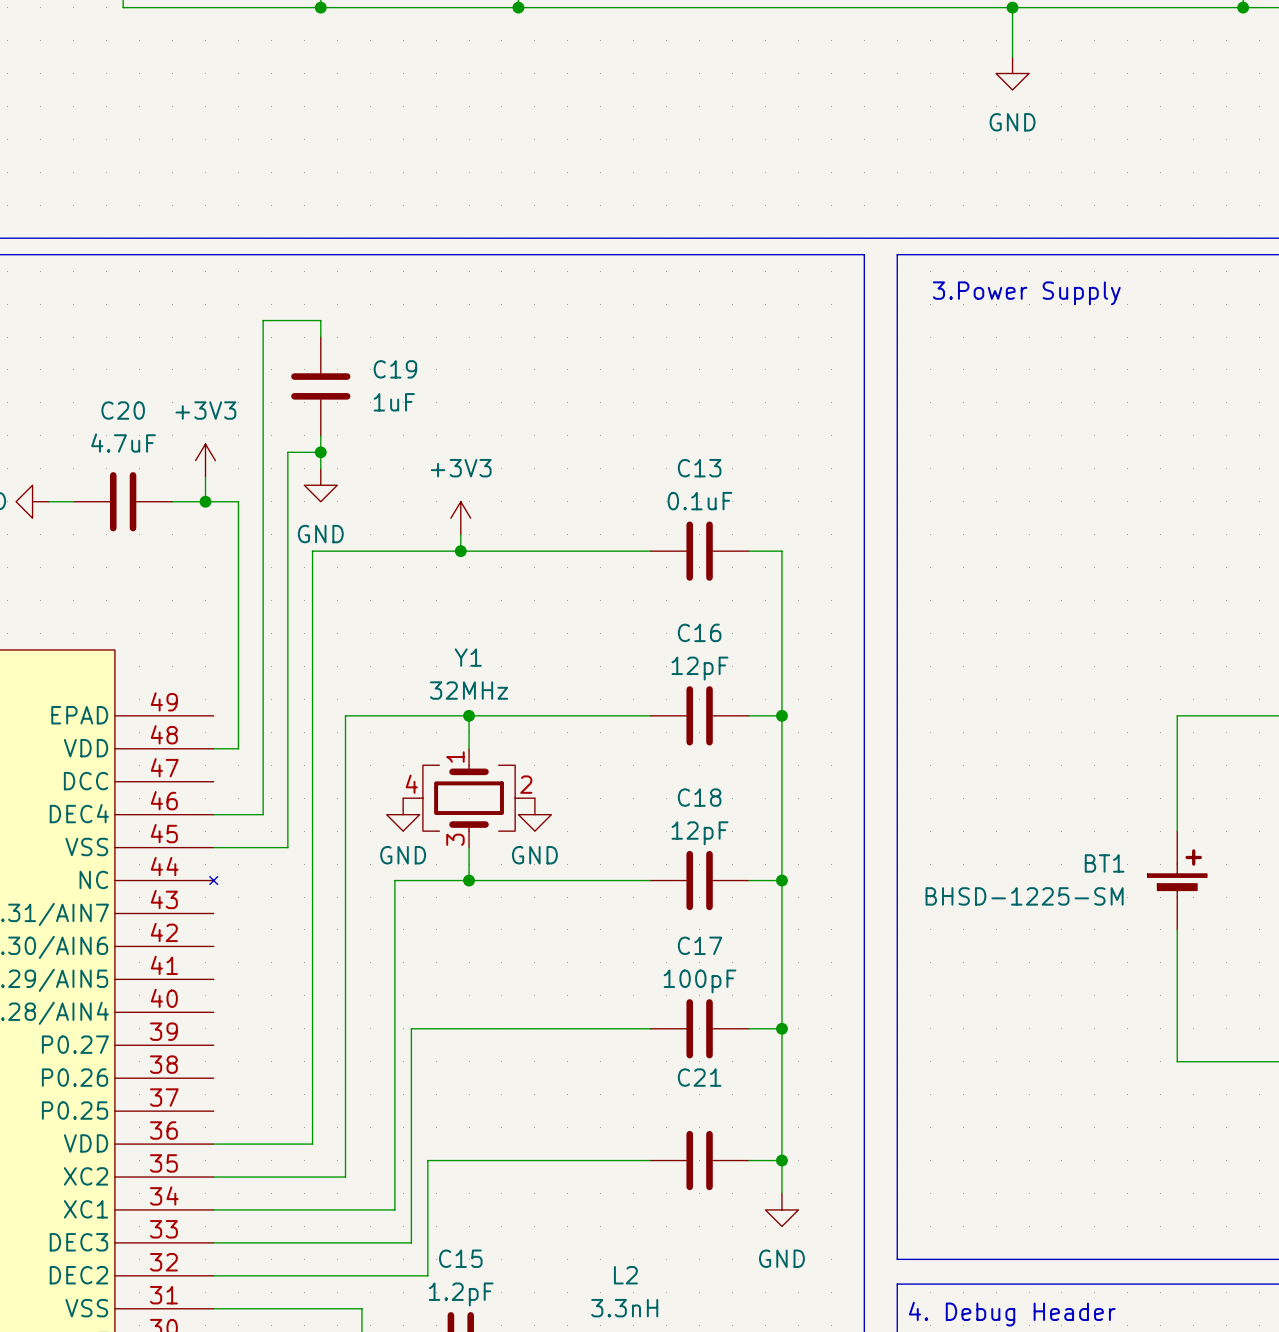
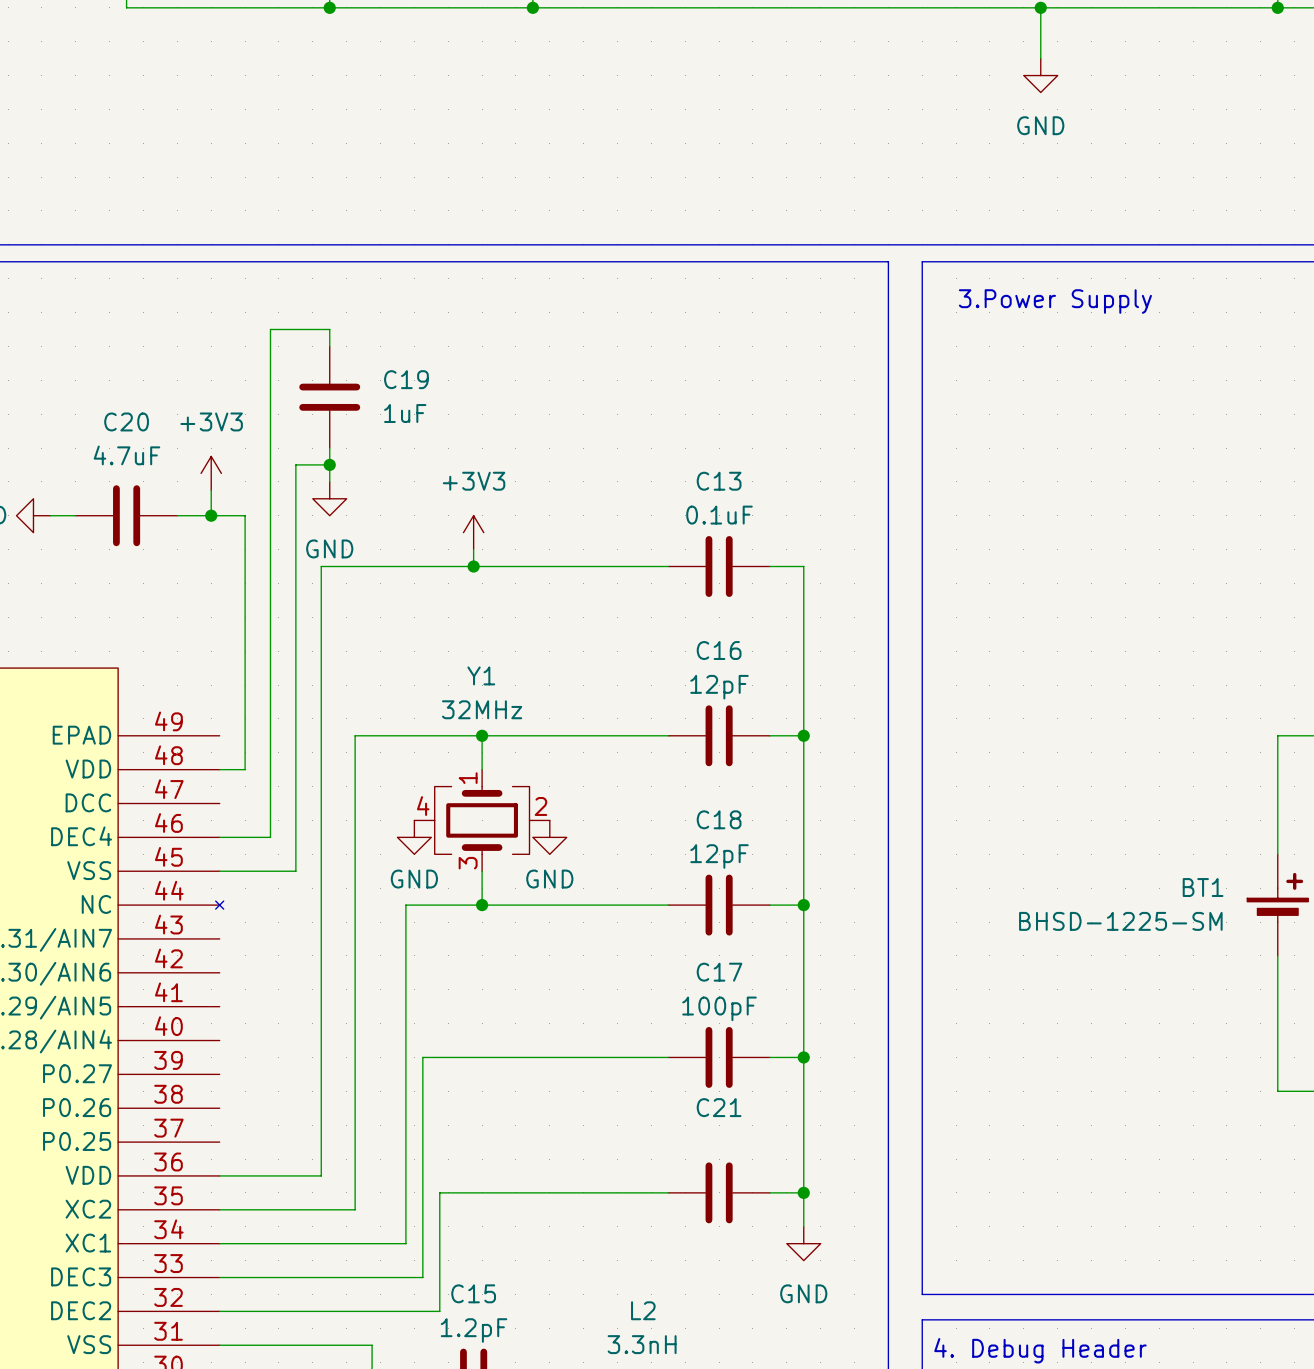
wire: (1243, 715) (1177, 715) (1177, 831) -> (1277, 735) (1277, 854)
BT1 position: (1177, 880) -> (1277, 905)
wire: (1177, 929) (1177, 1061) (1243, 1061) -> (1277, 955) (1277, 1091)

